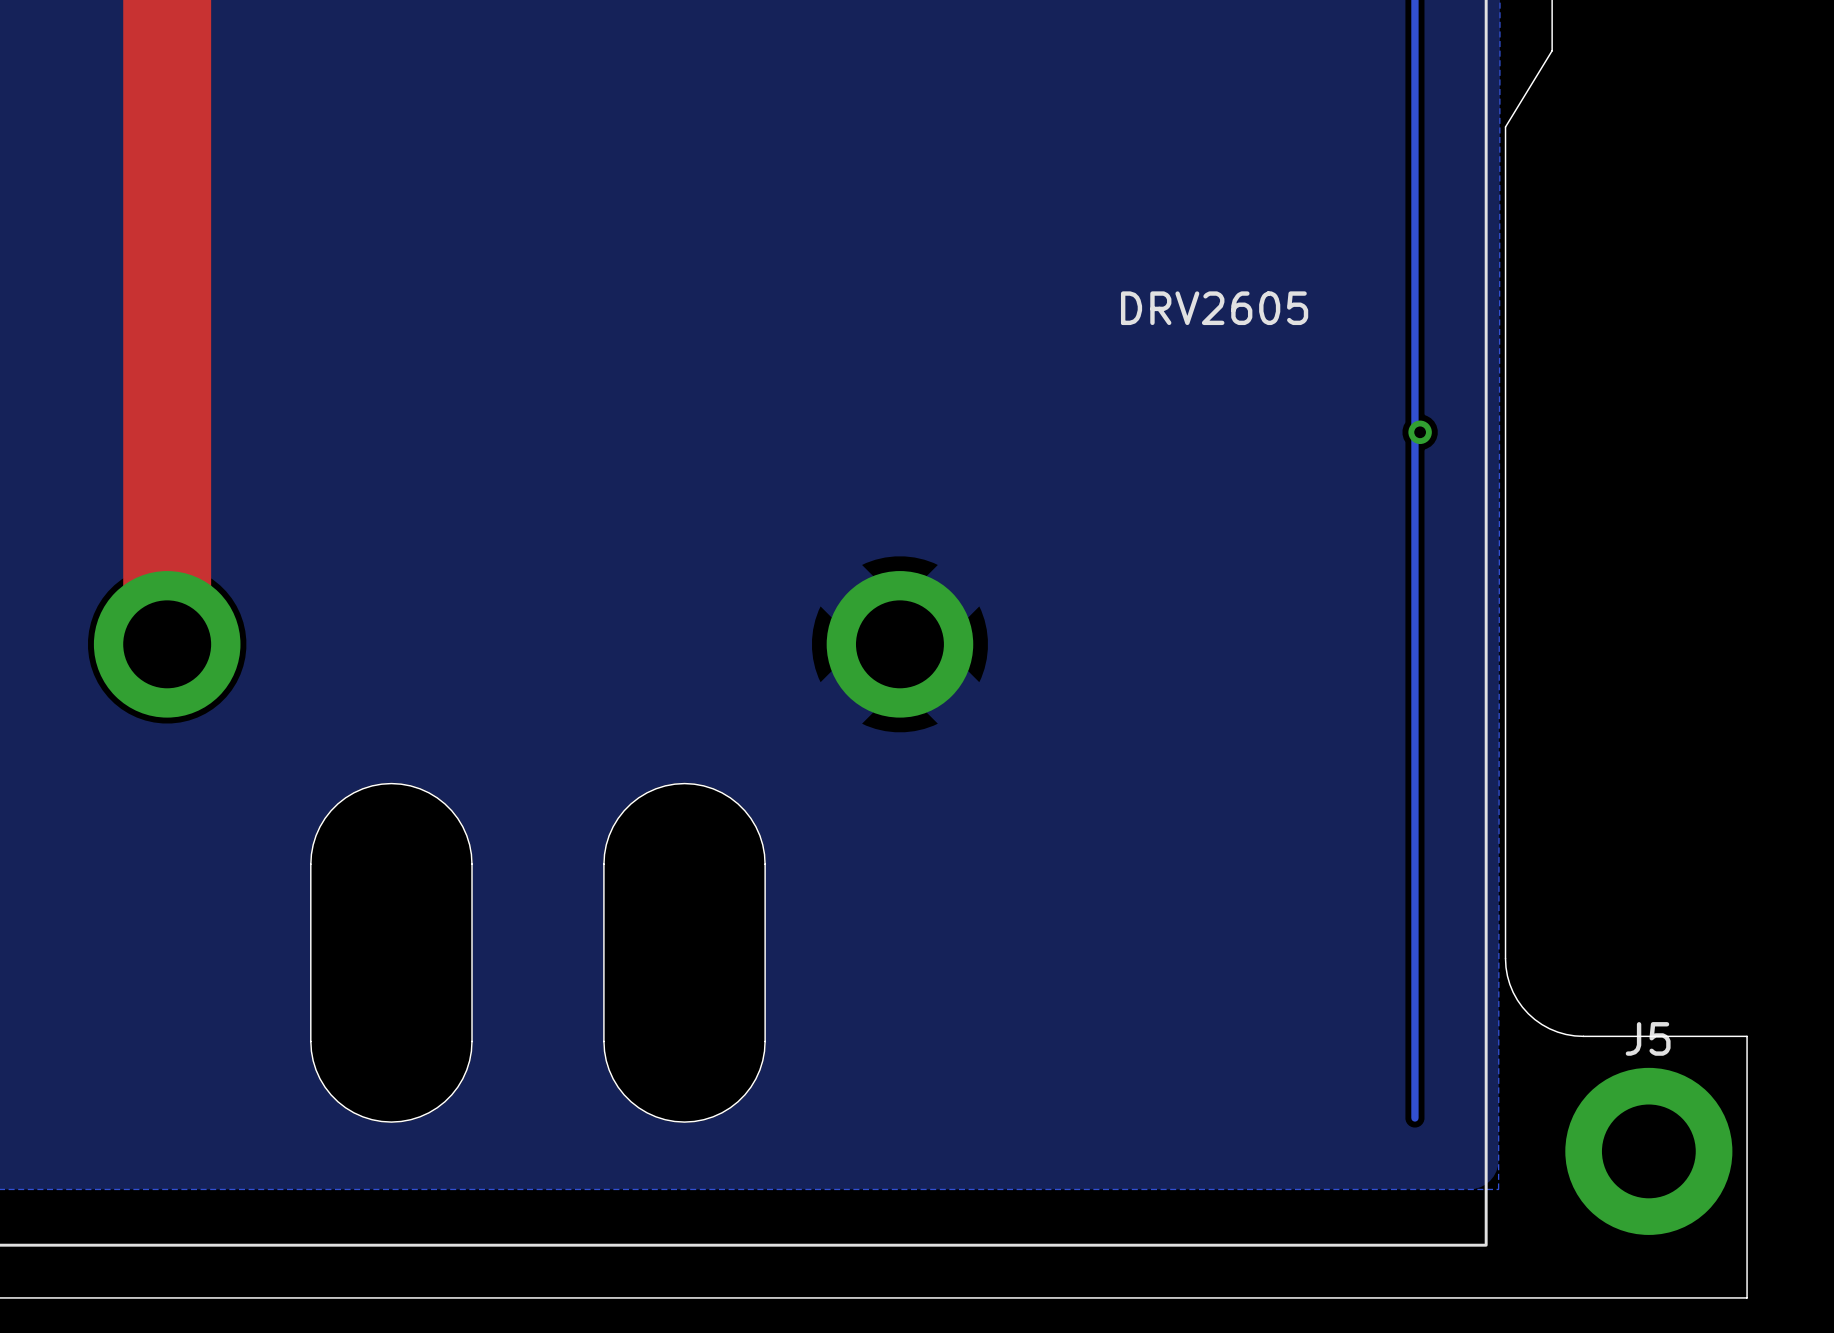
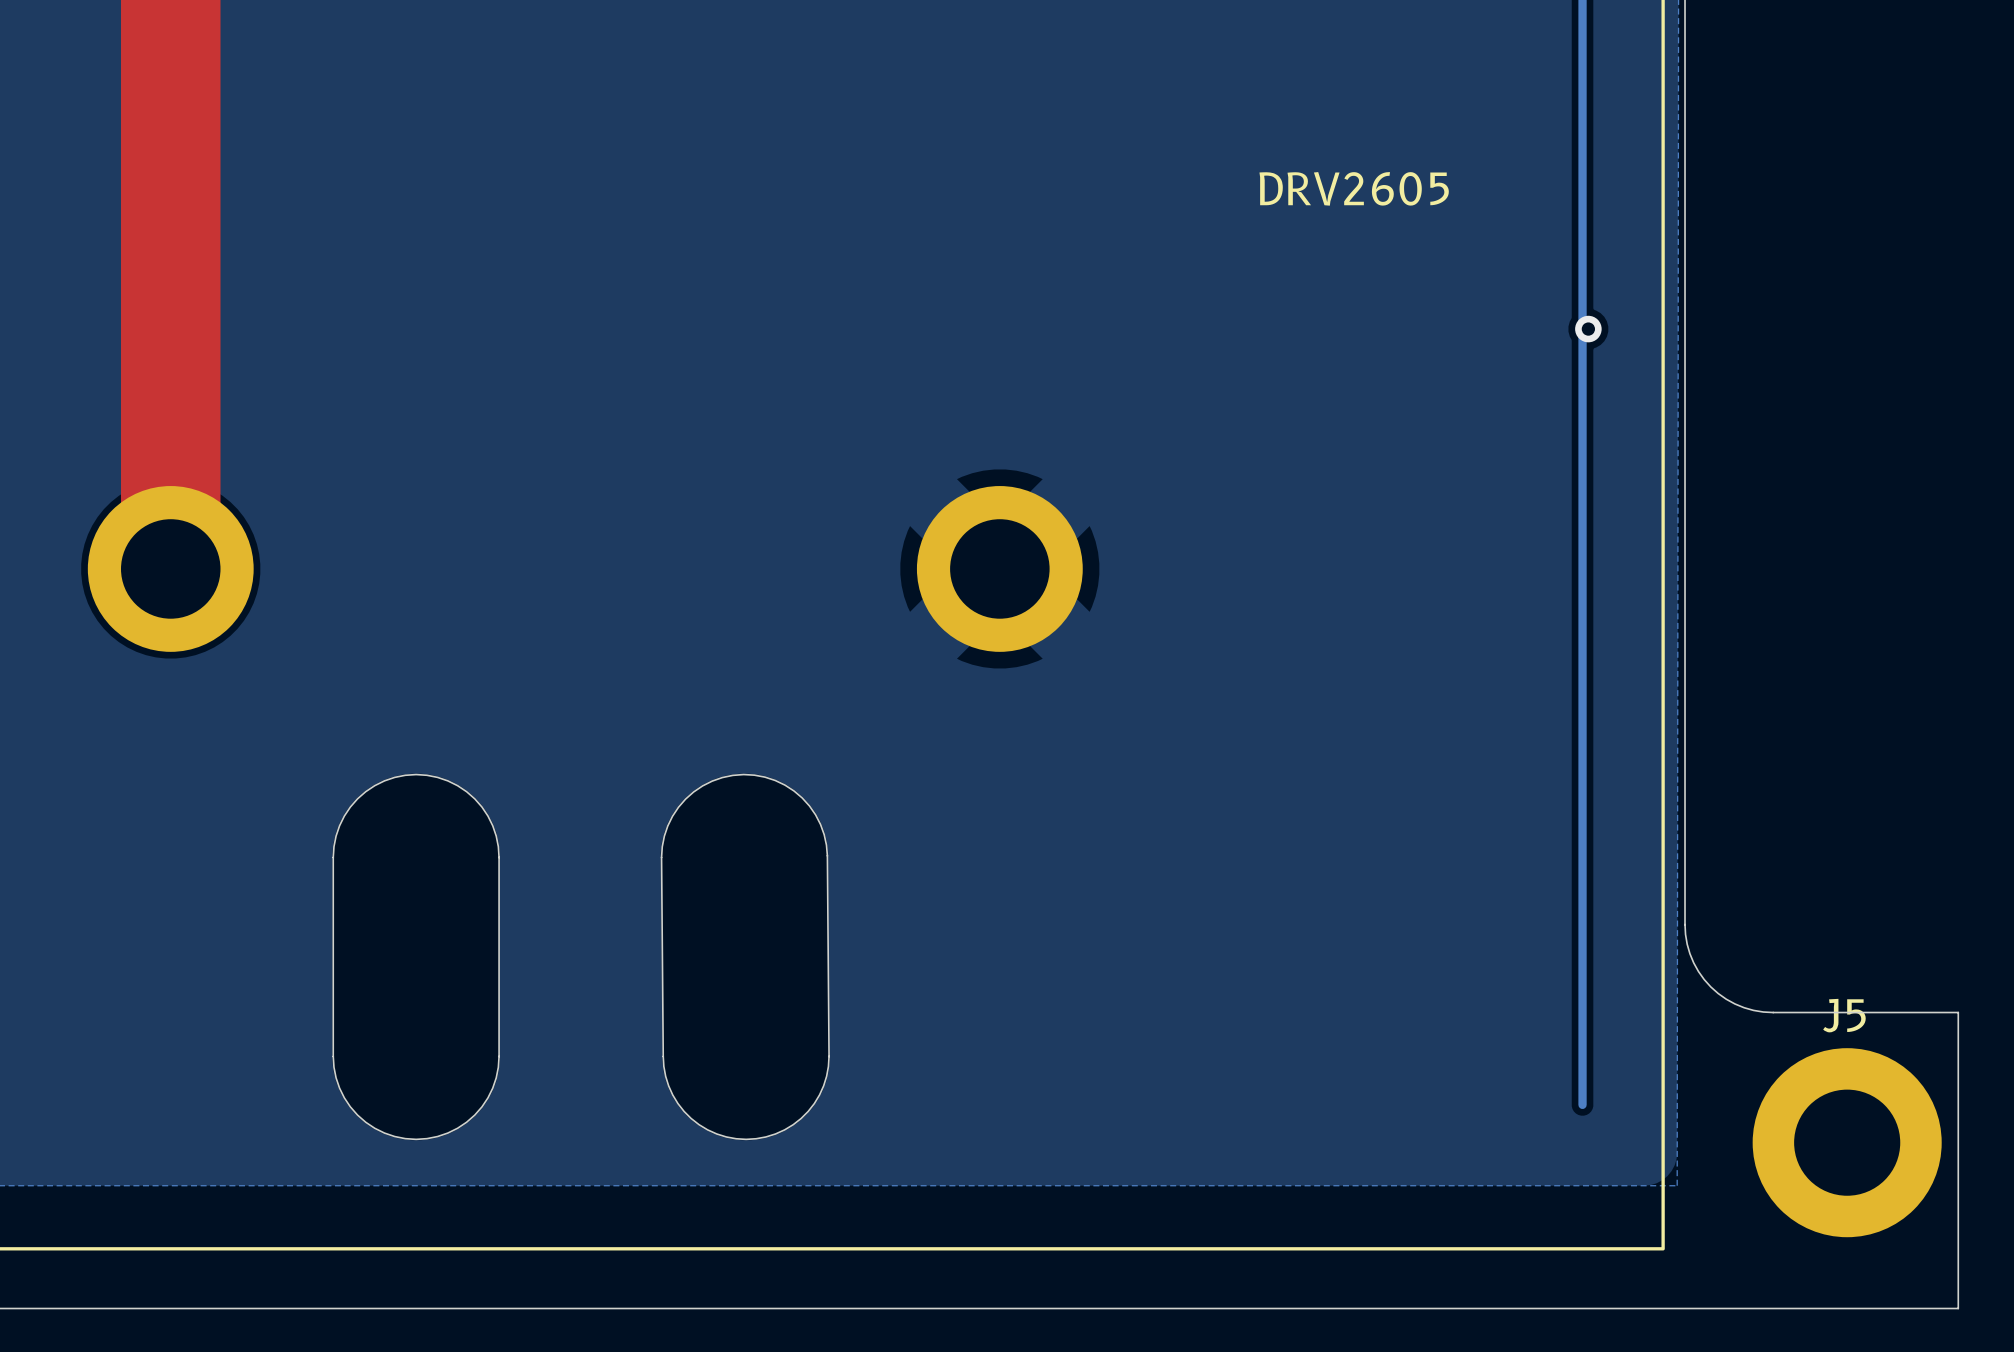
board edge: (603, 864) (603, 1041) (606, 1060) (613, 1078) (631, 1101) (647, 1112) (665, 1119) (694, 1121) (721, 1112) (737, 1101) (750, 1087) (759, 1070) (764, 1051) (765, 864) (762, 844) (755, 826) (737, 803) (713, 788) (684, 783) (665, 785) (638, 797) (624, 810) (609, 835) (603, 864) -> (827, 855) (829, 1056) (823, 1085) (814, 1103) (801, 1118) (775, 1133) (746, 1139) (716, 1133) (691, 1118) (677, 1103) (668, 1085) (663, 1066) (661, 857) (667, 825) (678, 807) (702, 785) (732, 775) (754, 775) (784, 785) (802, 797) (820, 824) (827, 855)
board edge: (310, 899) (311, 854) (320, 826) (337, 803) (362, 788) (391, 783) (419, 788) (437, 797) (451, 810) (466, 835) (472, 864) (472, 1041) (466, 1070) (457, 1087) (437, 1107) (410, 1119) (391, 1122) (362, 1116) (337, 1101) (325, 1087) (313, 1060) (310, 1041) -> (333, 857) (336, 836) (350, 807) (374, 785) (394, 777) (416, 774) (437, 777) (457, 785) (481, 807) (496, 836) (499, 857) (499, 1056) (492, 1088) (474, 1115) (447, 1133) (416, 1139) (384, 1133) (357, 1115) (339, 1088) (333, 1067) (333, 1018)

